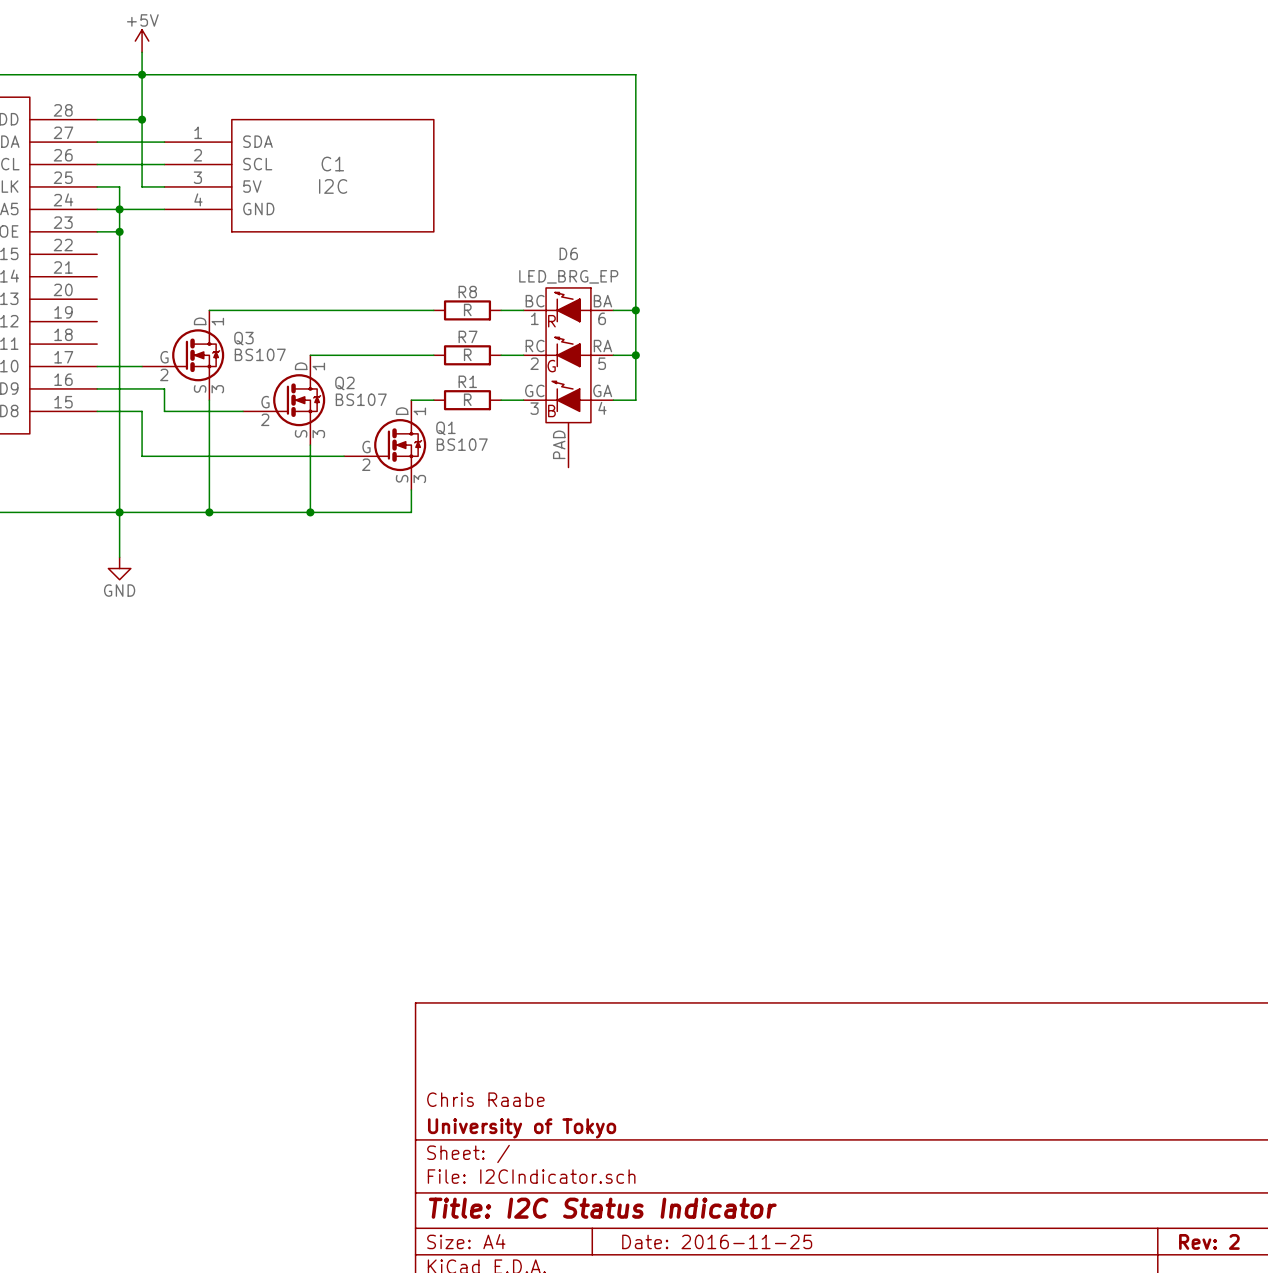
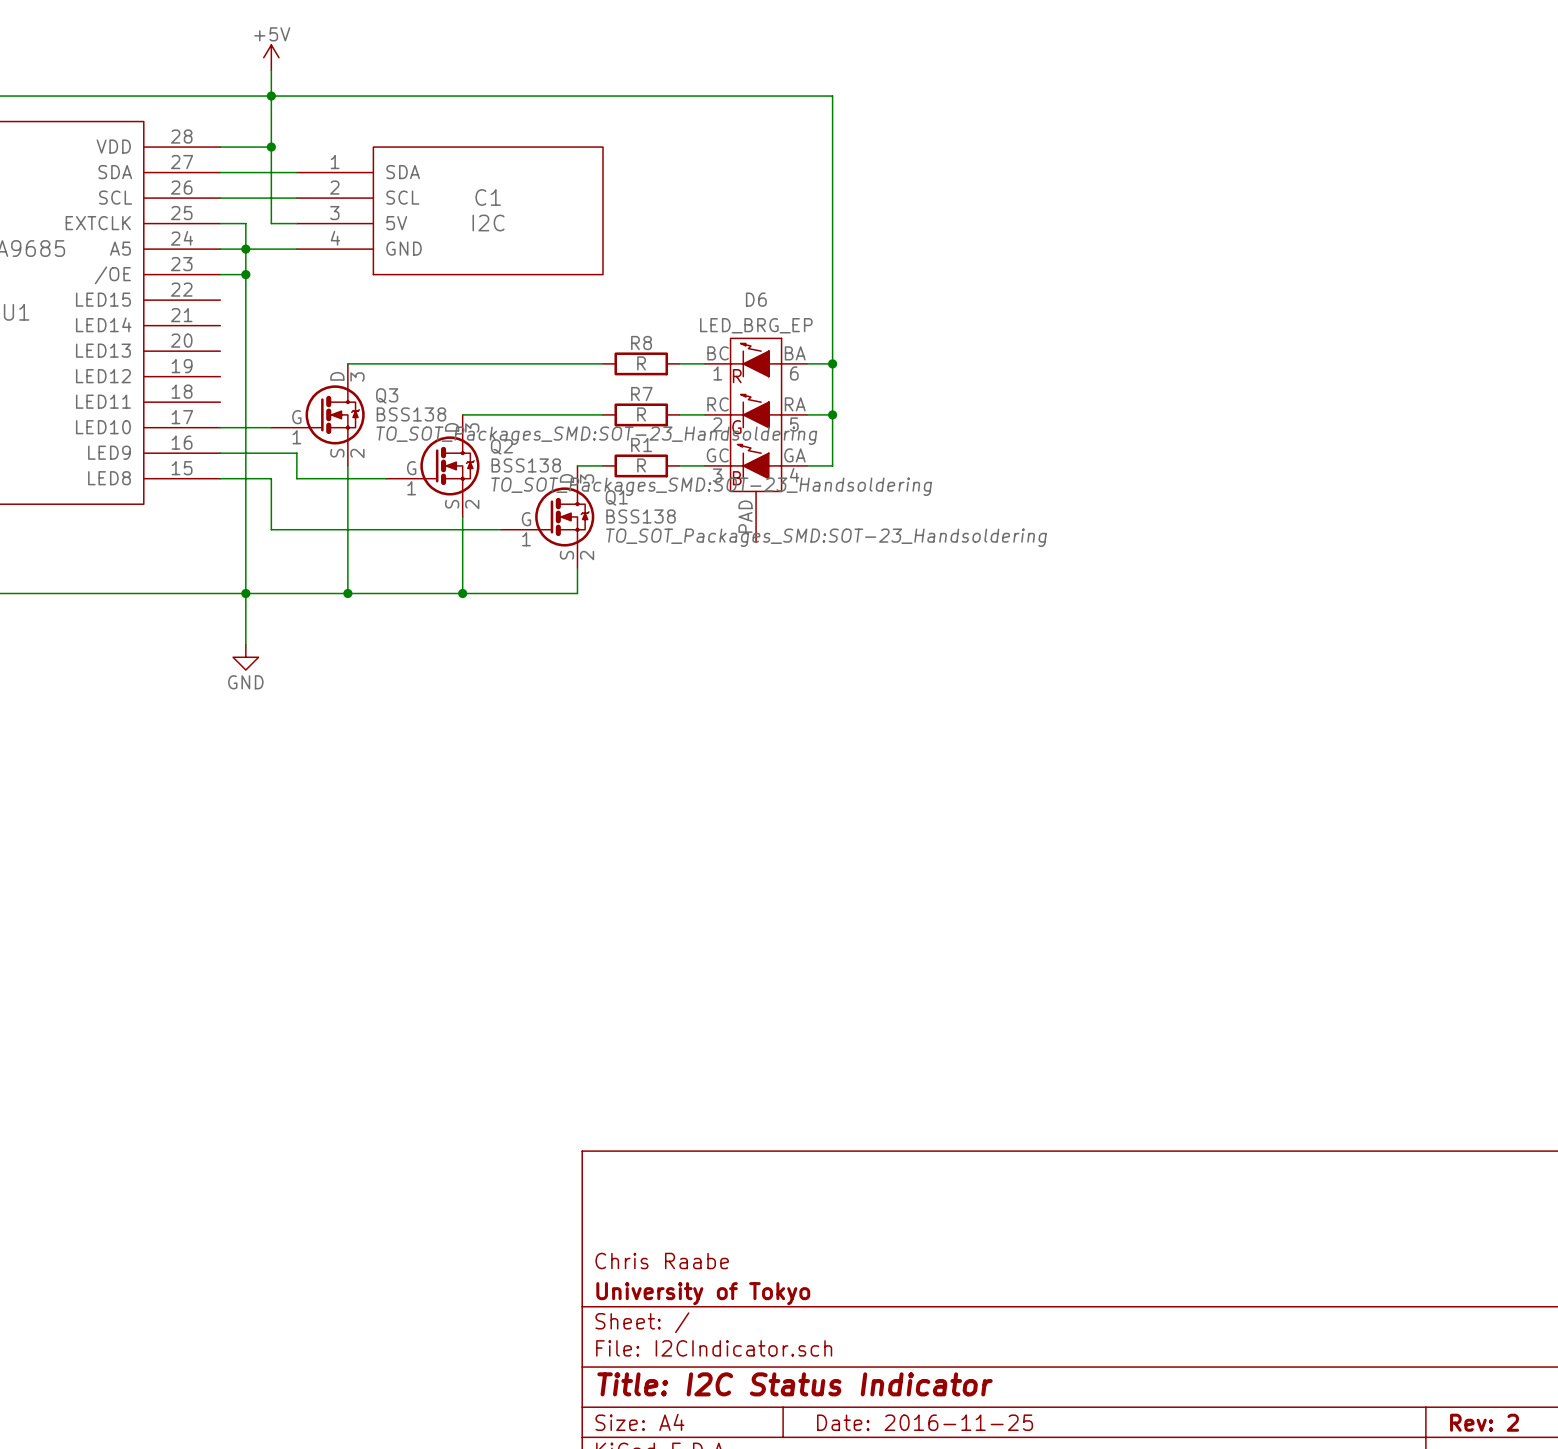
Q3 pin number: 1 (217, 321) -> 3 (357, 376)
Q3 value: BS107 (260, 354) -> BSS138 (411, 414)
Q2 pin number: 1 (318, 366) -> 3 (472, 427)
Q3 text: none -> TO_SOT_Packages_SMD:SOT-23_Handsoldering (596, 435)
Q3 pin number: 2 (164, 374) -> 1 (296, 437)
Q3 pin number: 3 (217, 389) -> 2 (357, 453)
Q2 value: BS107 (361, 399) -> BSS138 (526, 465)
Q1 pin number: 1 (419, 411) -> 3 (587, 479)
Q2 text: none -> TO_SOT_Packages_SMD:SOT-23_Handsoldering (711, 486)
Q2 pin number: 2 (265, 419) -> 1 (411, 488)
Q2 pin number: 3 (318, 434) -> 2 (472, 504)
Q1 value: BS107 (462, 444) -> BSS138 (641, 516)
Q1 text: none -> TO_SOT_Packages_SMD:SOT-23_Handsoldering (826, 537)
Q1 pin number: 2 (366, 464) -> 1 (526, 539)
Q1 pin number: 3 (419, 479) -> 2 (587, 555)

